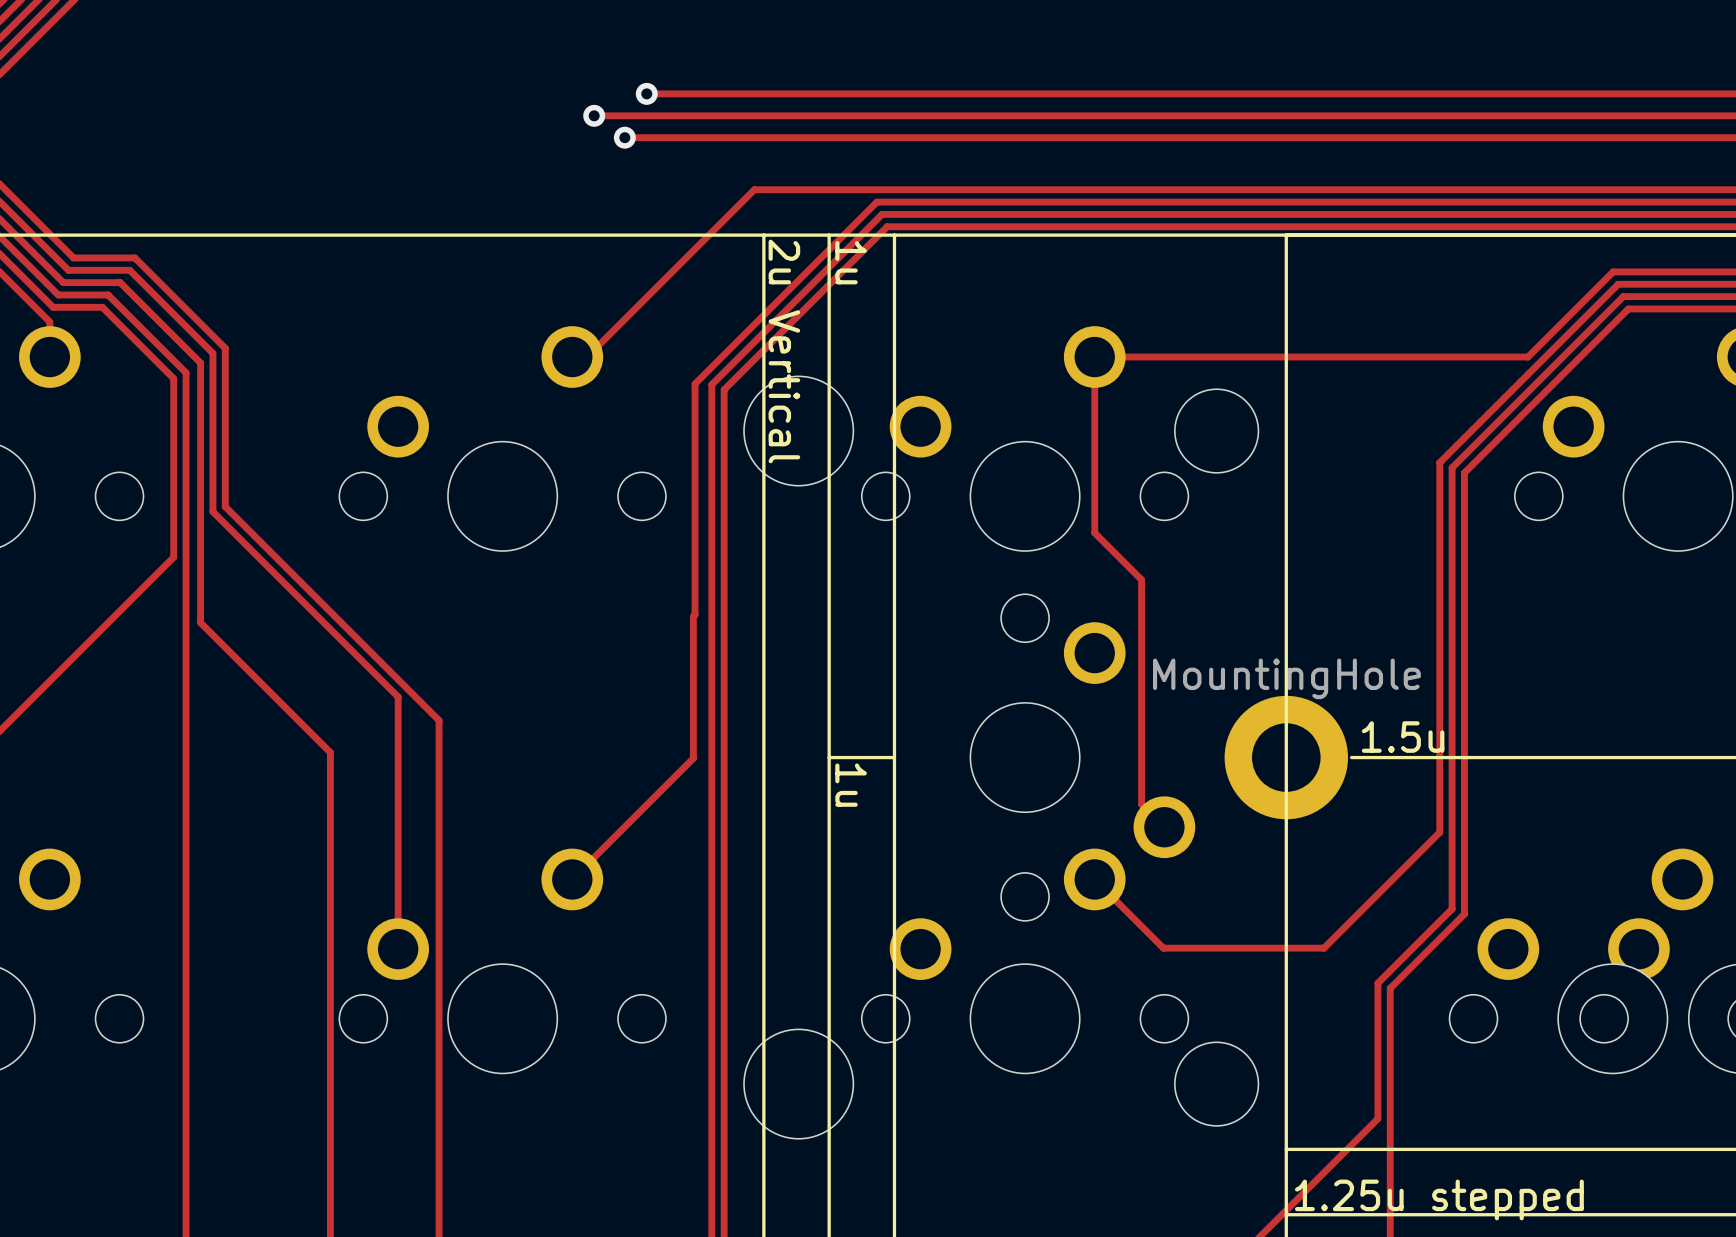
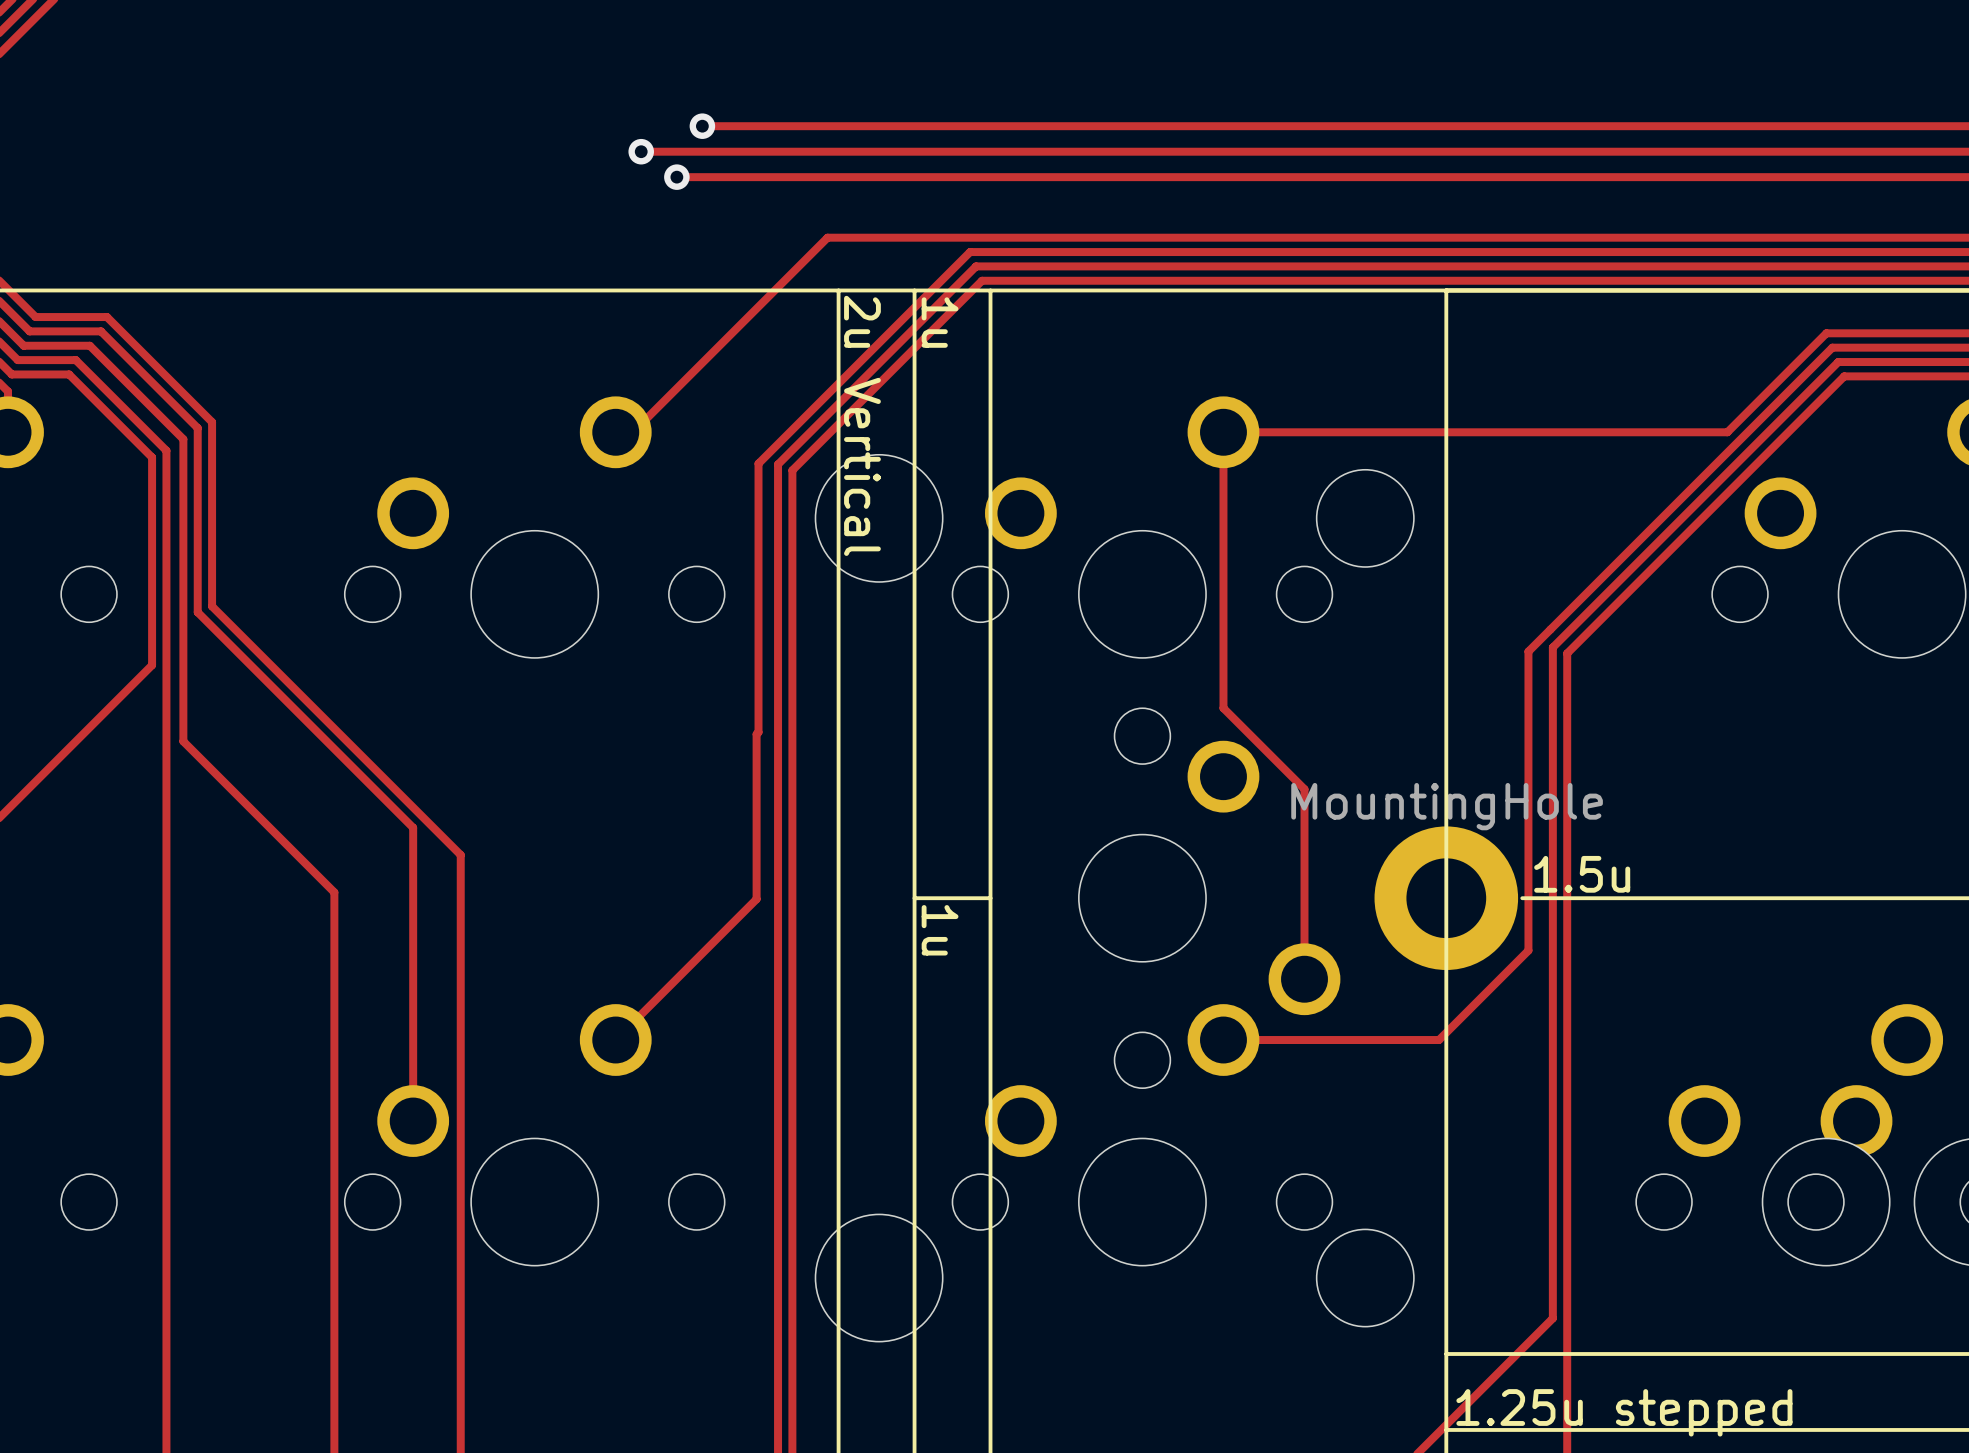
track: (1439, 462) (1439, 832) (1324, 948) (1163, 948) (1094, 879) -> (1624, 555) (1528, 651) (1528, 950) (1439, 1040) (1223, 1040)
track: (1452, 467) (1452, 909) (1377, 983) -> (1639, 561) (1552, 647) (1552, 1160)
track: (1464, 472) (1464, 914) (1390, 988) -> (1653, 567) (1567, 653) (1567, 1166)
track: (1094, 532) (1141, 579) (1141, 804) (1164, 827) -> (1223, 636) (1223, 708) (1304, 789) (1304, 979)

